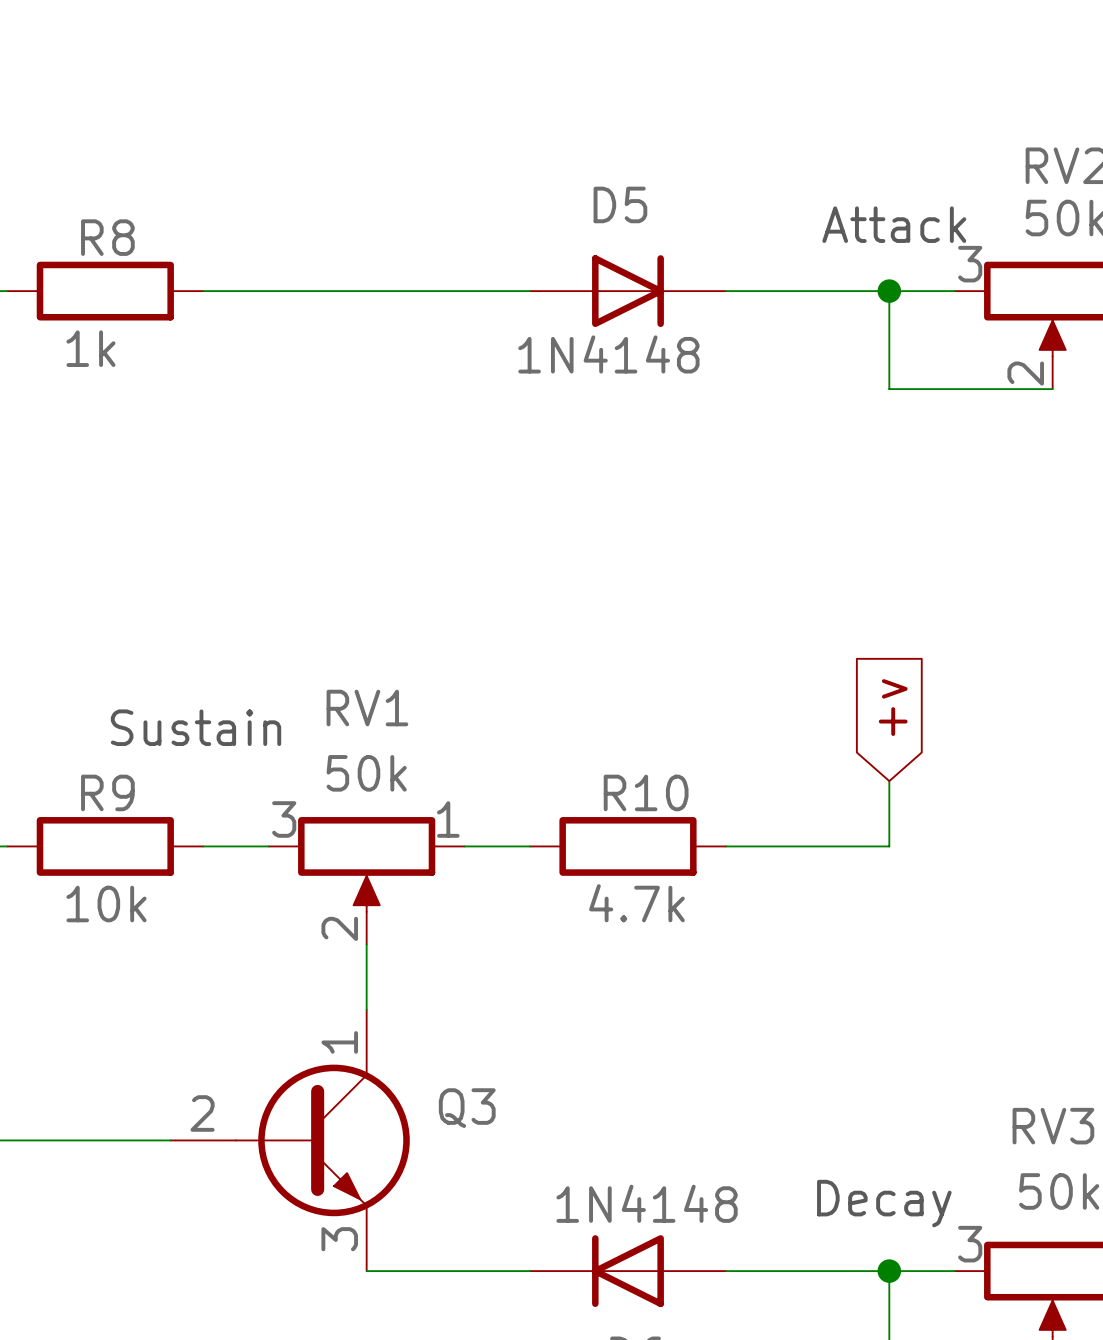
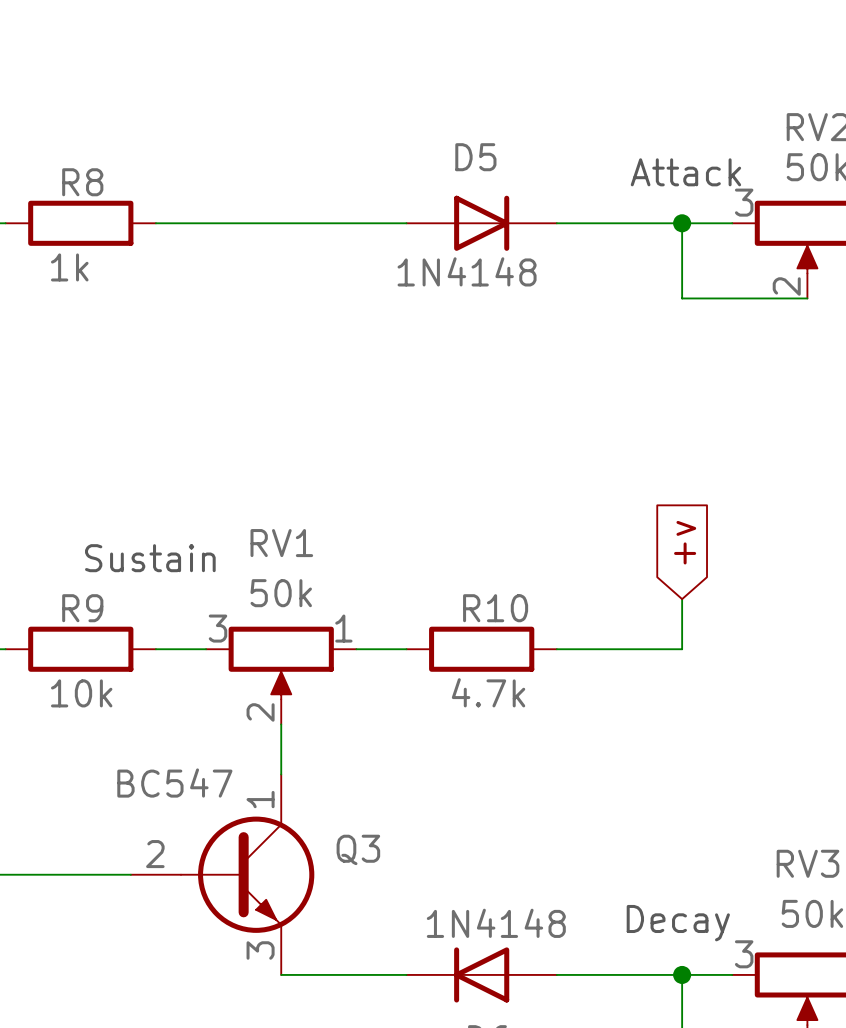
Q3 value: none -> BC547 (174, 783)

